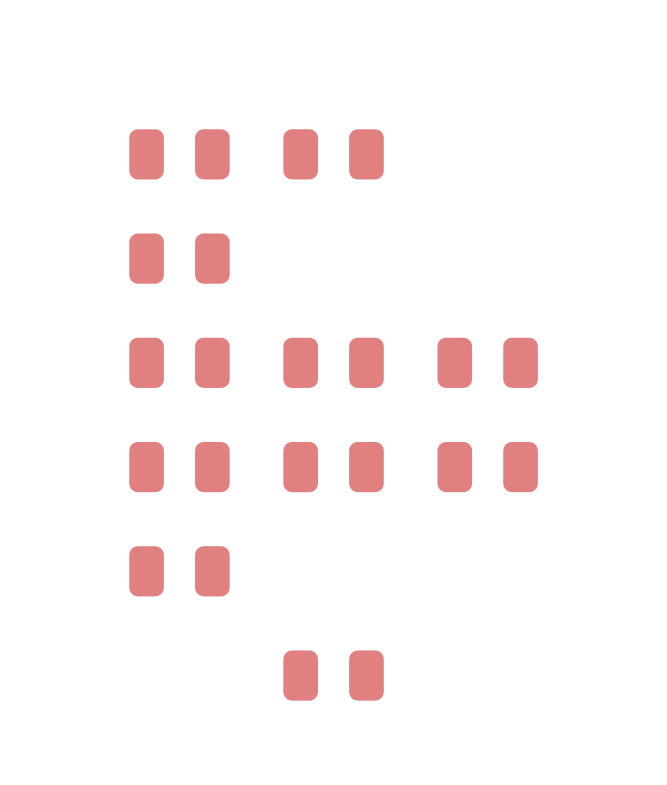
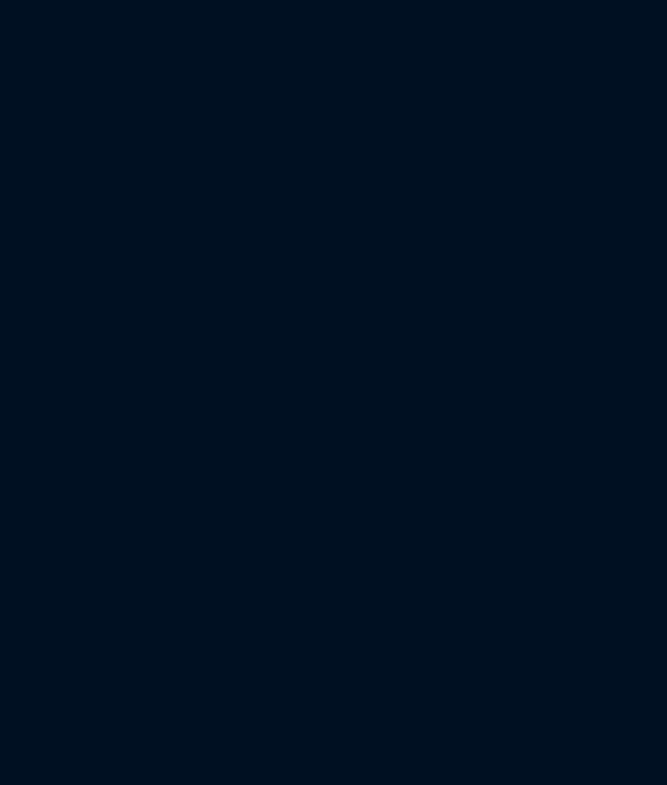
part: (179, 154) -> none
part: (333, 154) -> none
part: (179, 258) -> none
part: (179, 362) -> none
part: (333, 362) -> none
part: (487, 362) -> none
part: (179, 467) -> none
part: (333, 467) -> none
part: (487, 467) -> none
part: (179, 571) -> none
part: (333, 675) -> none

